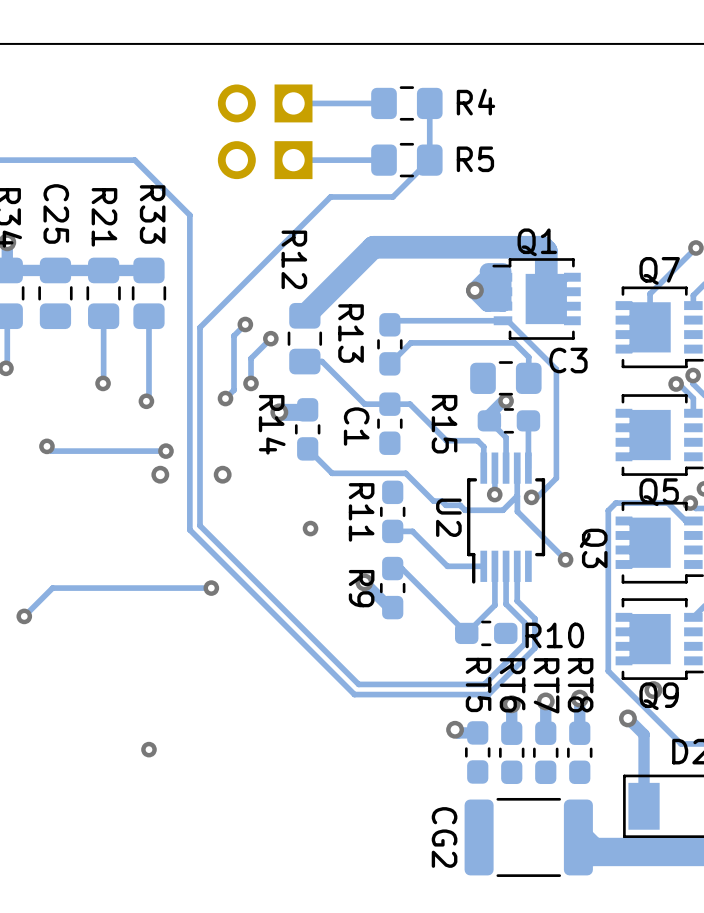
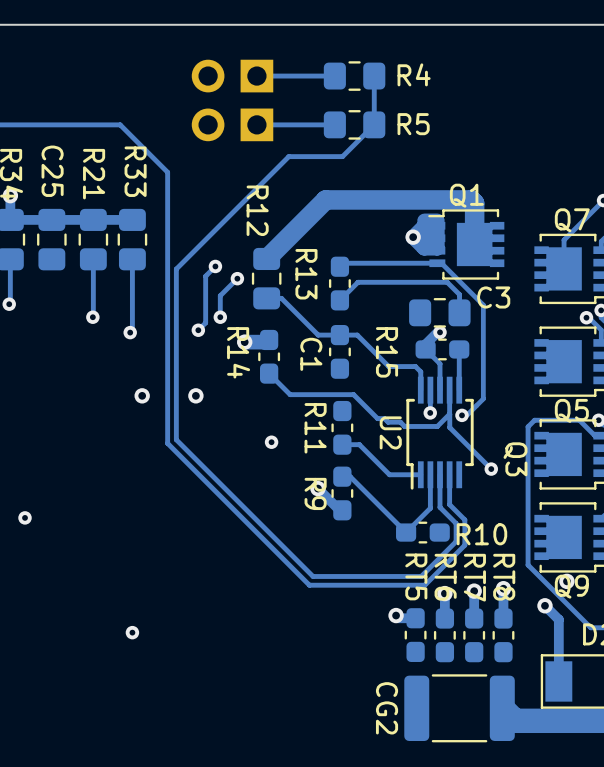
track: (46, 446) (51, 451) (165, 451) -> none
via: (46, 446) -> none
via: (165, 451) -> none
track: (211, 588) (52, 588) (24, 616) -> none
via: (211, 588) -> none

